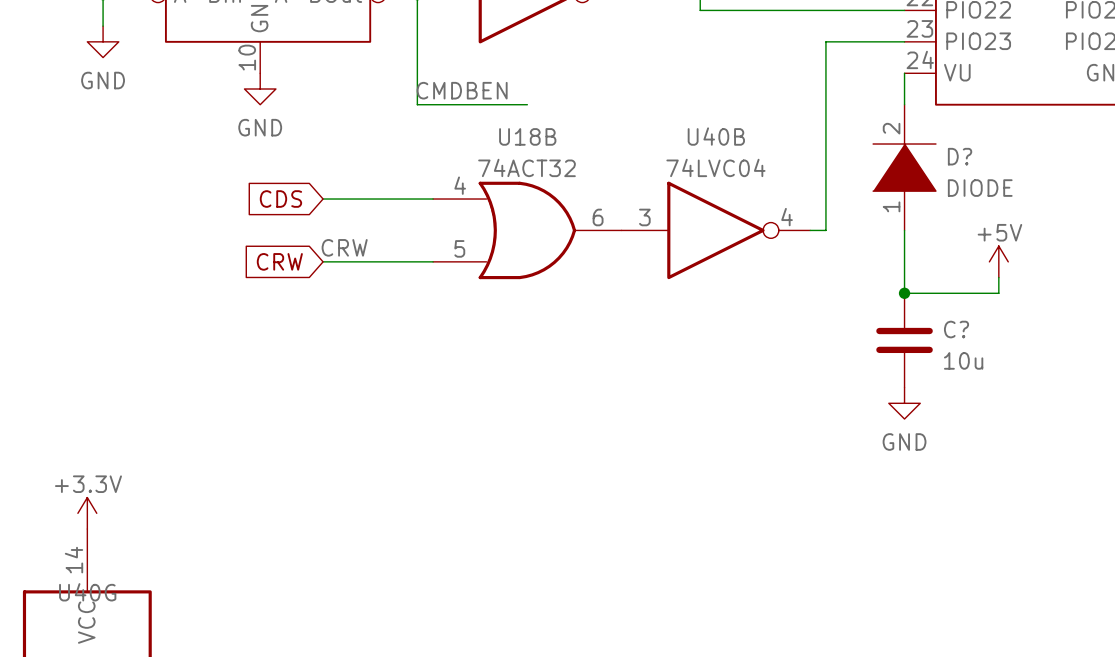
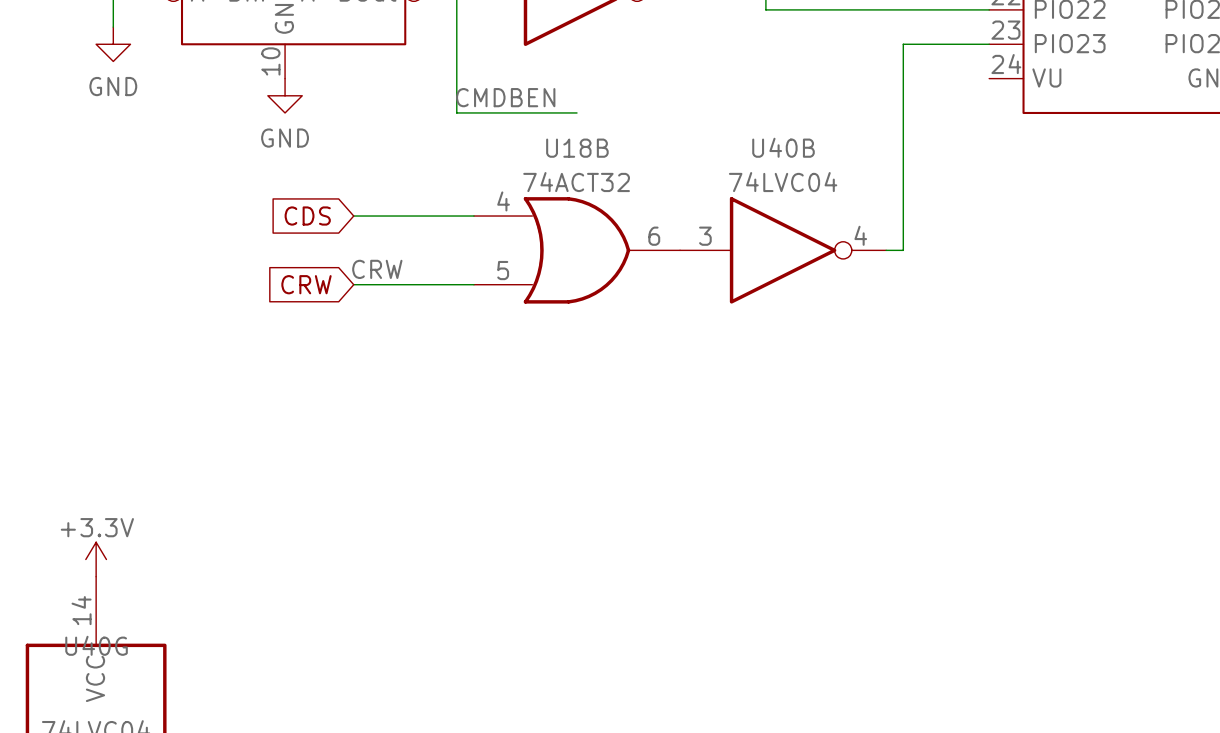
wire: (904, 73) (904, 104) -> none
D?: DIODE (904, 167) -> none
wire: (904, 230) (904, 293) (998, 293) (998, 277) -> none
power symbol: +5V (998, 261) -> none
junction: (904, 293) -> none
C?: 10u (904, 340) -> none
power symbol: GND (904, 403) -> none

